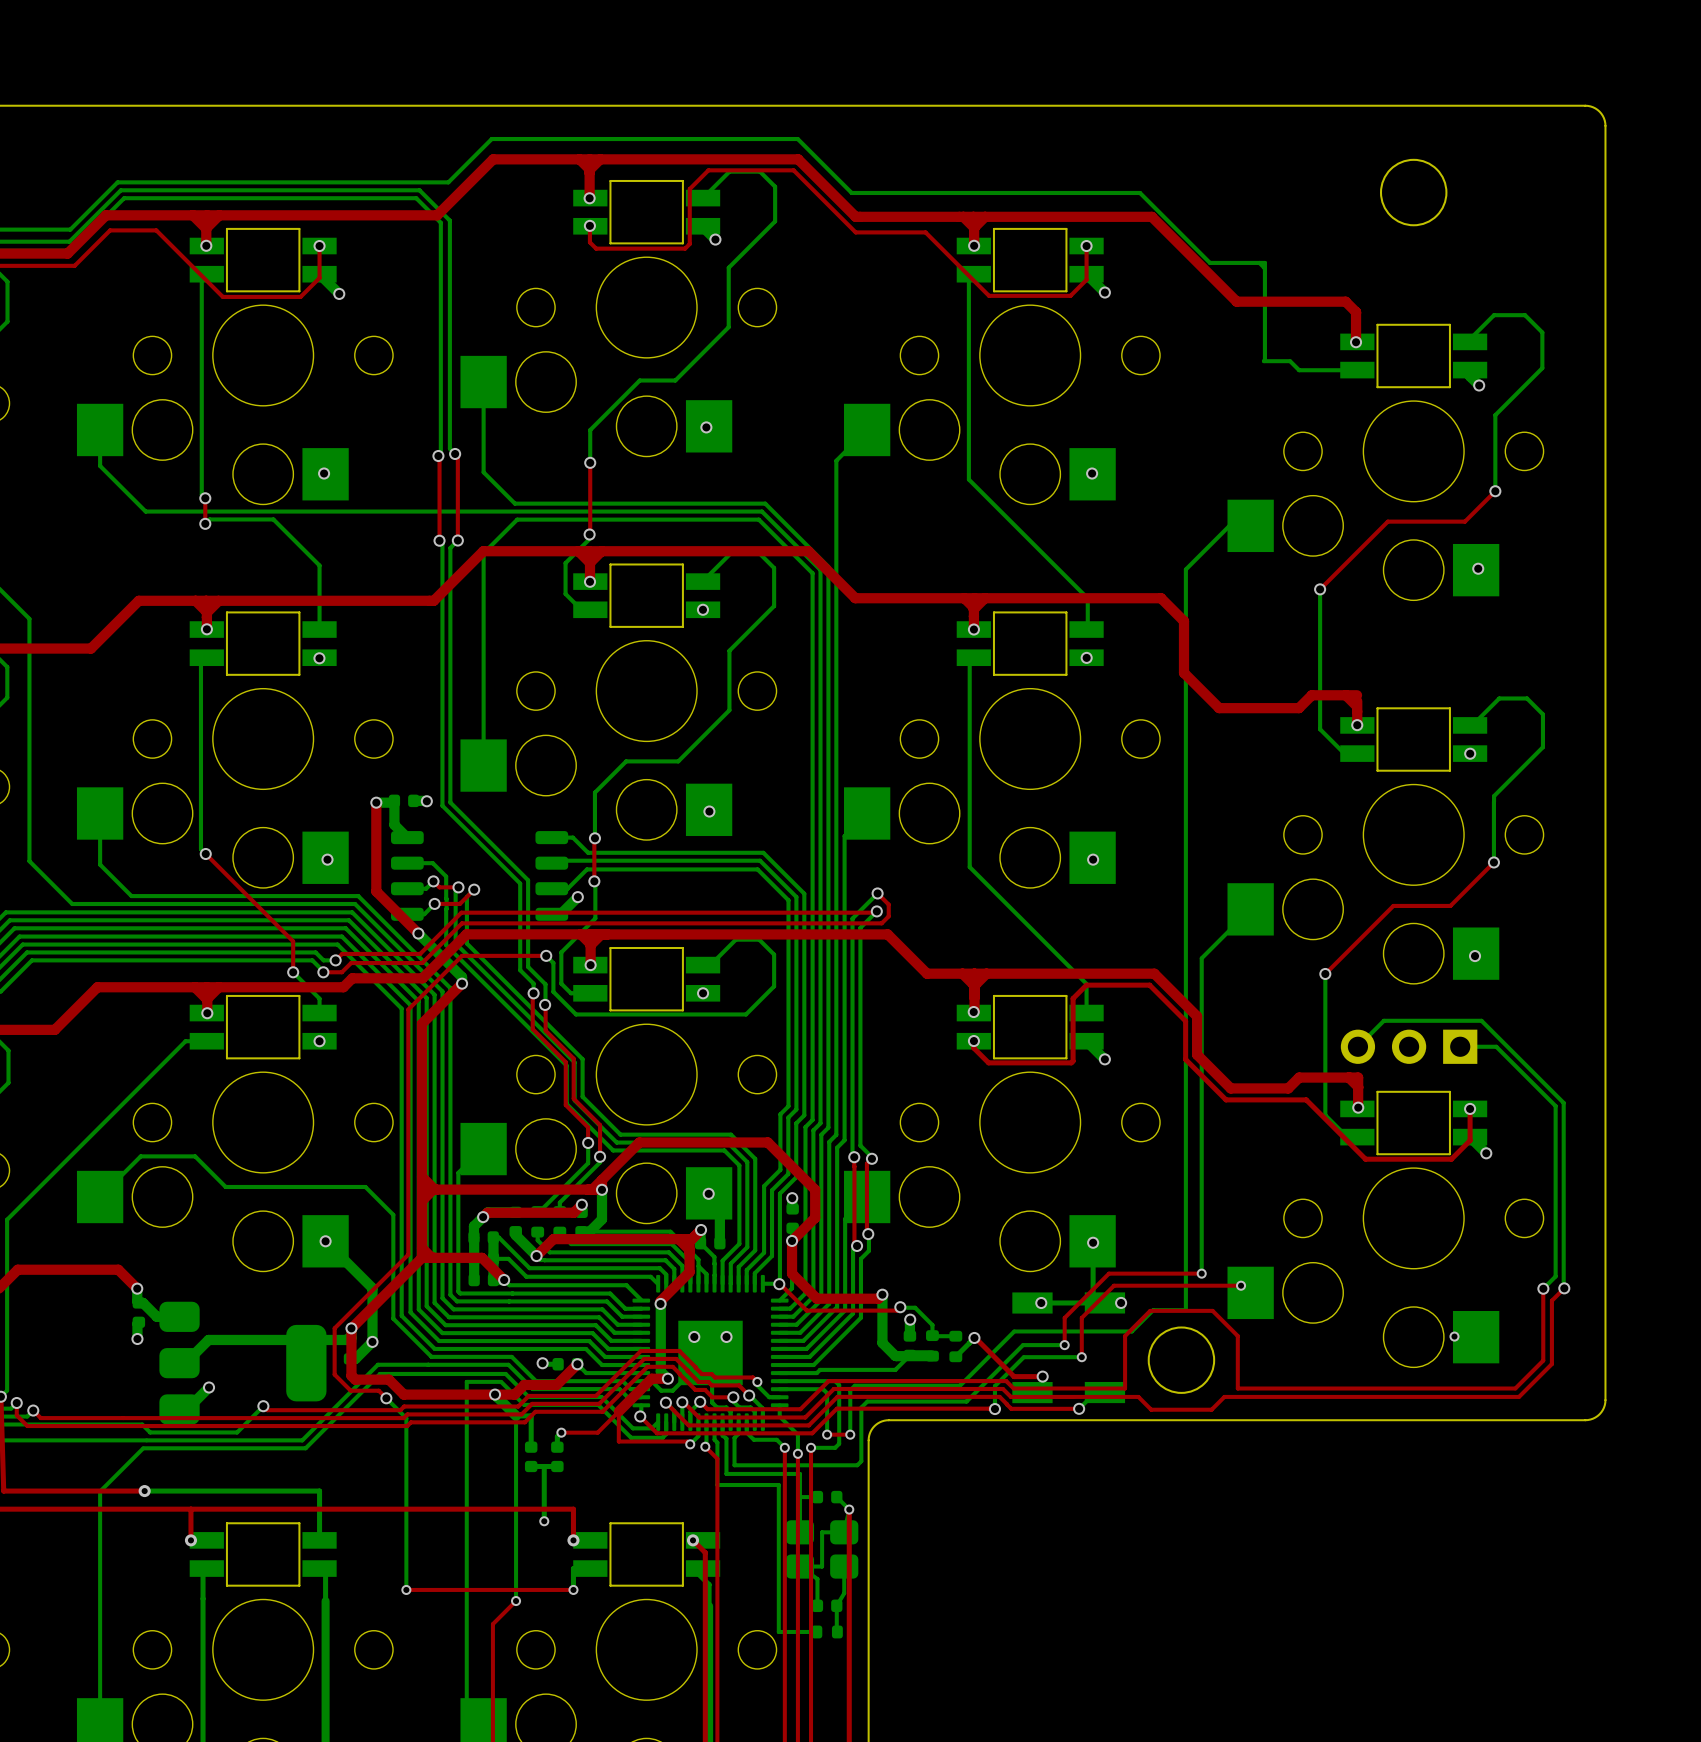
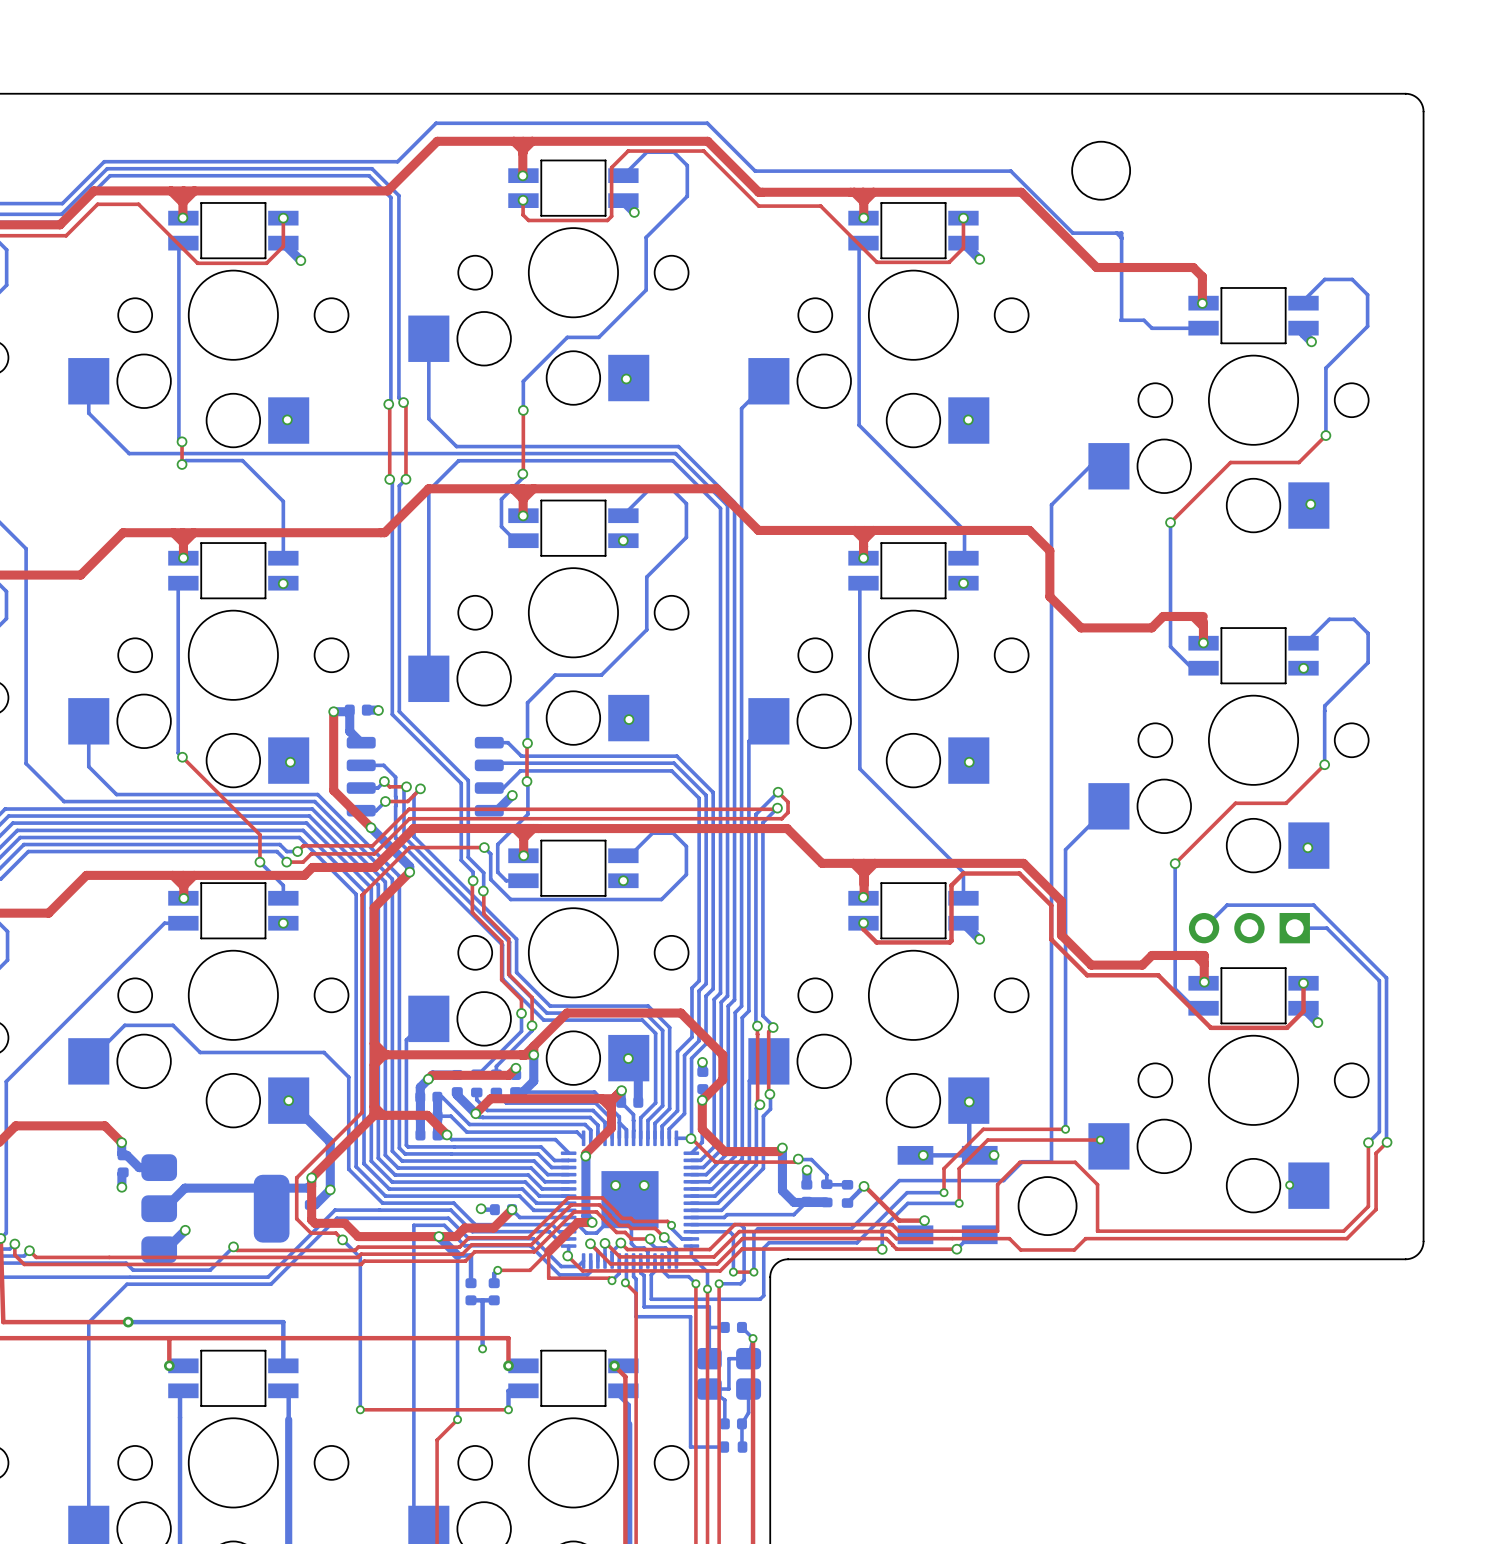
round board edge position: (1413, 192) -> (1101, 170)

